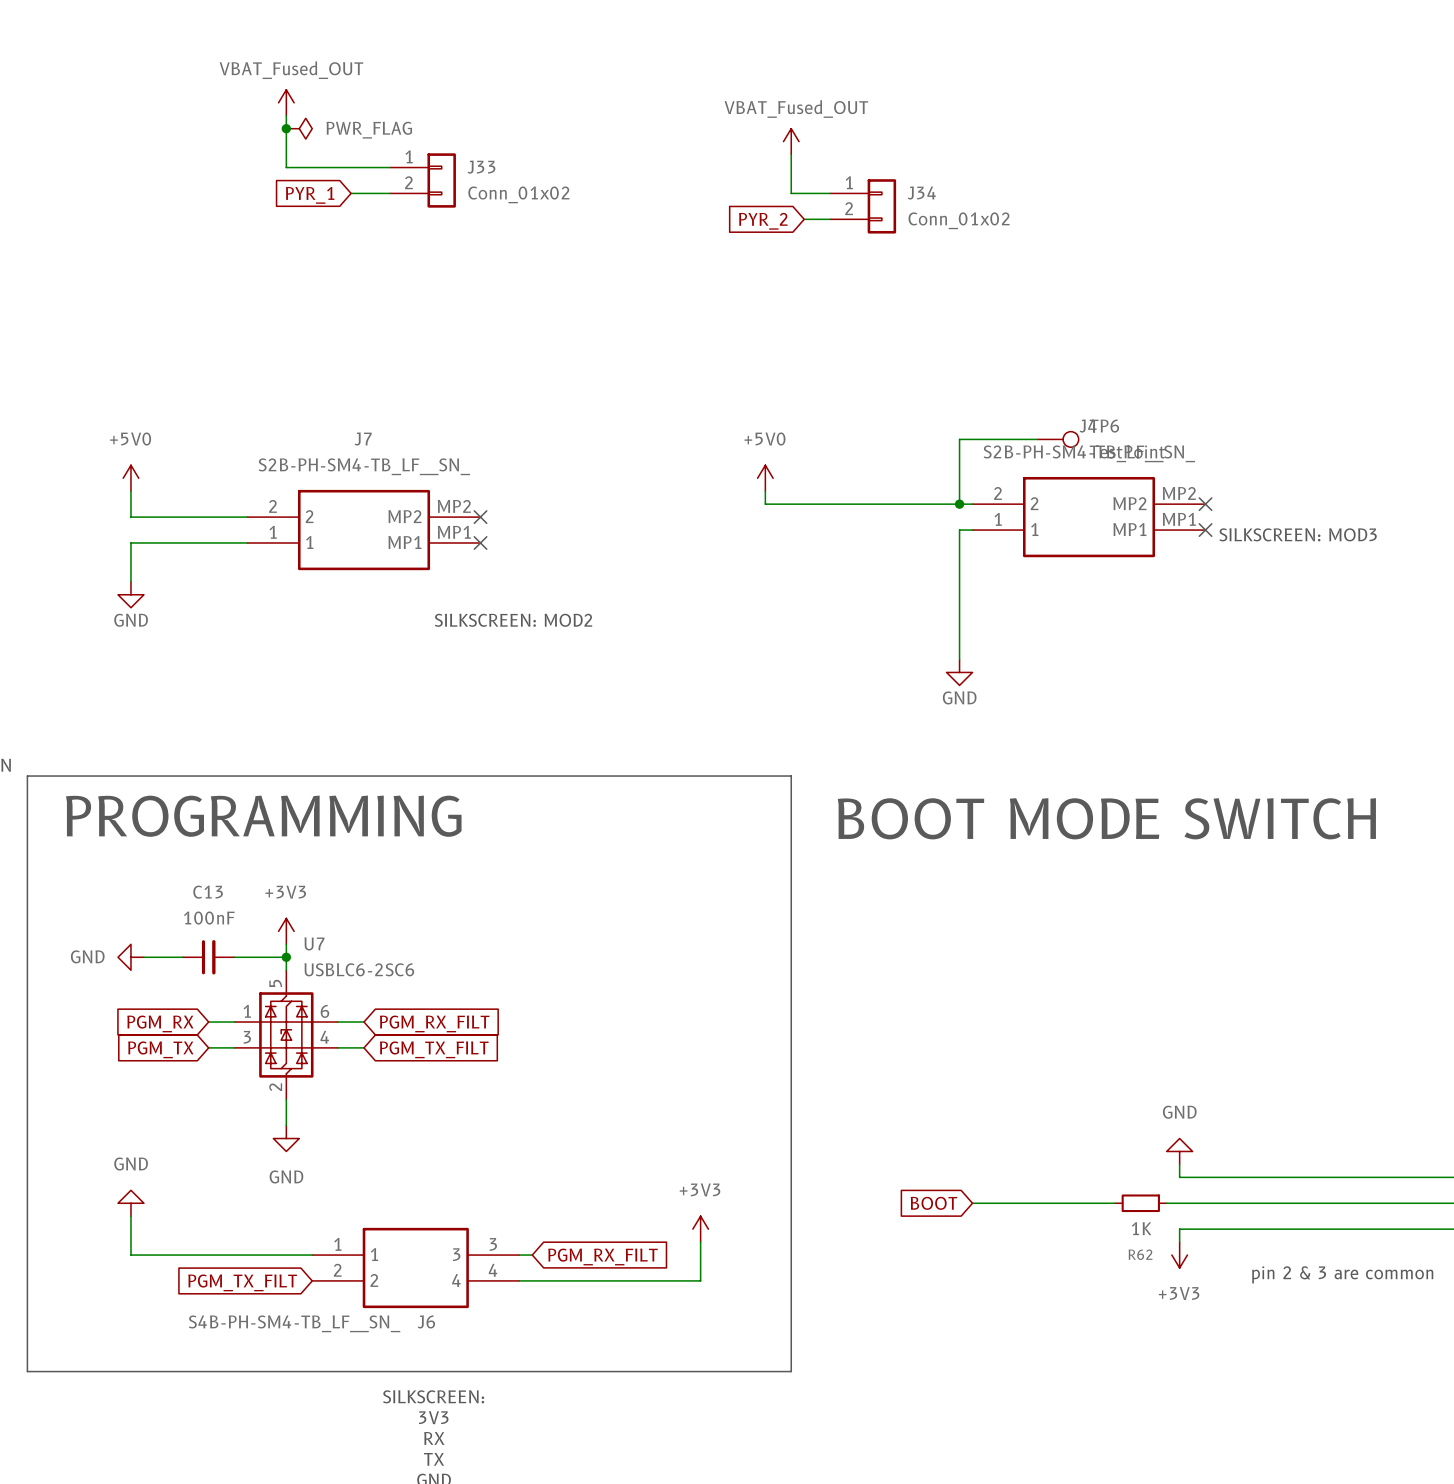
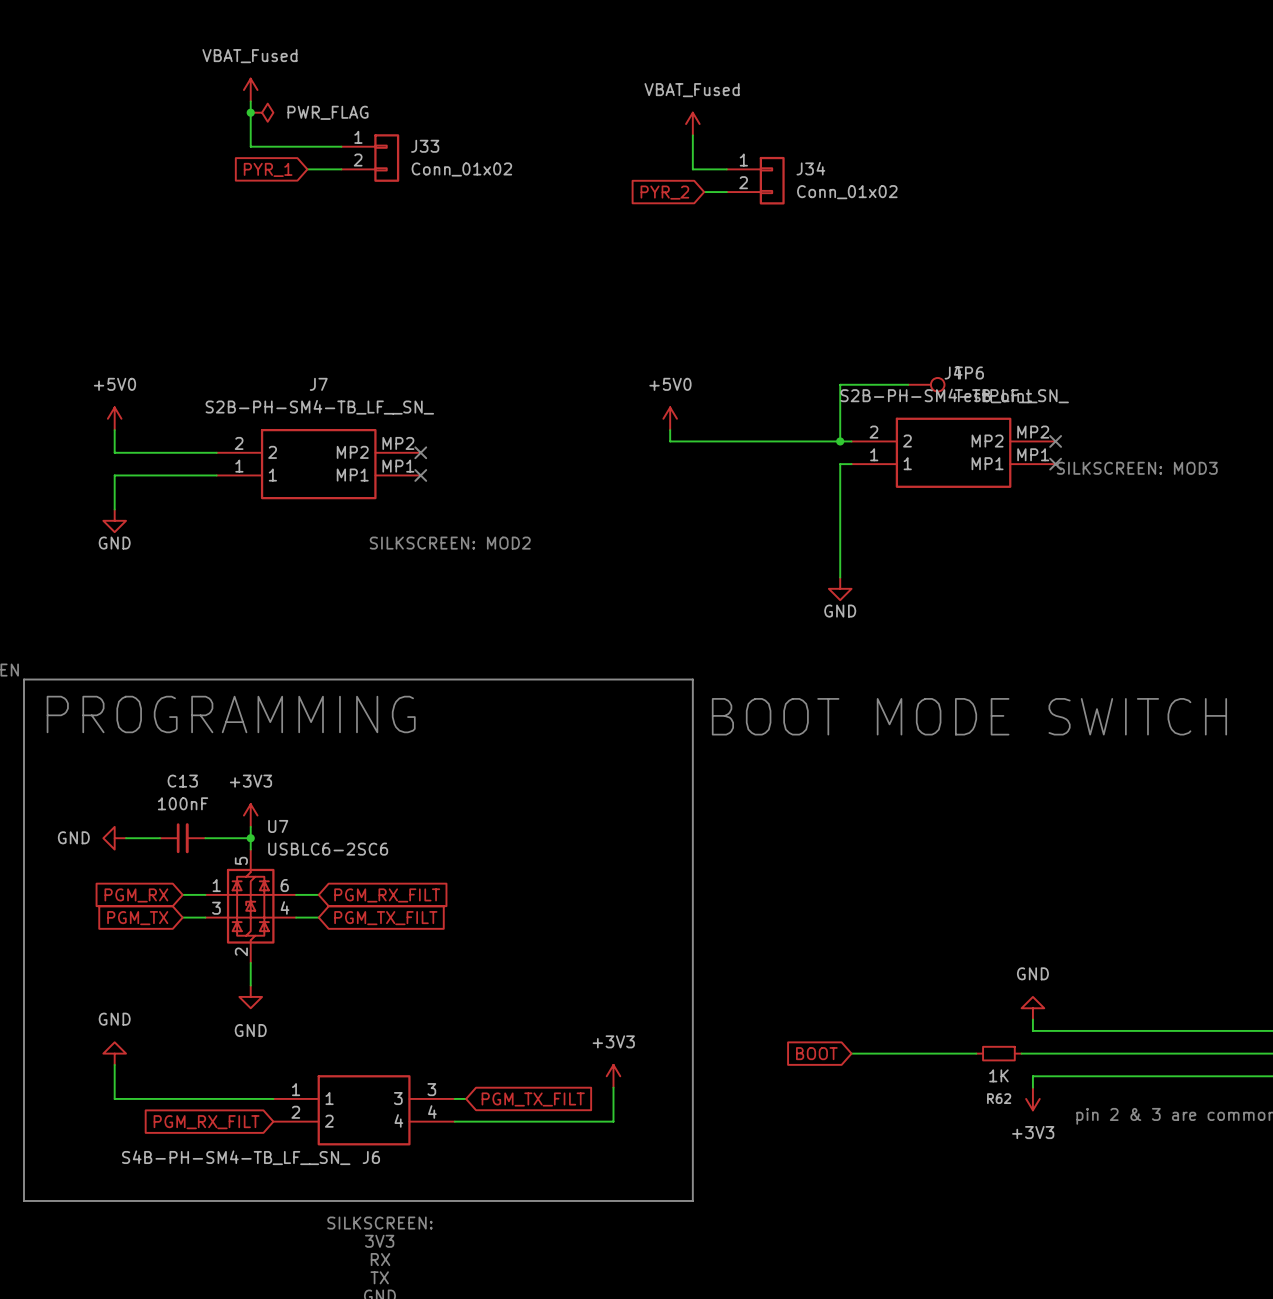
power symbol: VBAT_Fused_OUT (286, 102) -> VBAT_Fused (250, 90)
power symbol: VBAT_Fused_OUT (791, 141) -> VBAT_Fused (692, 124)
global label: PGM_RX_FILT (602, 1256) -> PGM_TX_FILT (533, 1099)
global label: PGM_TX_FILT (242, 1282) -> PGM_RX_FILT (206, 1122)

